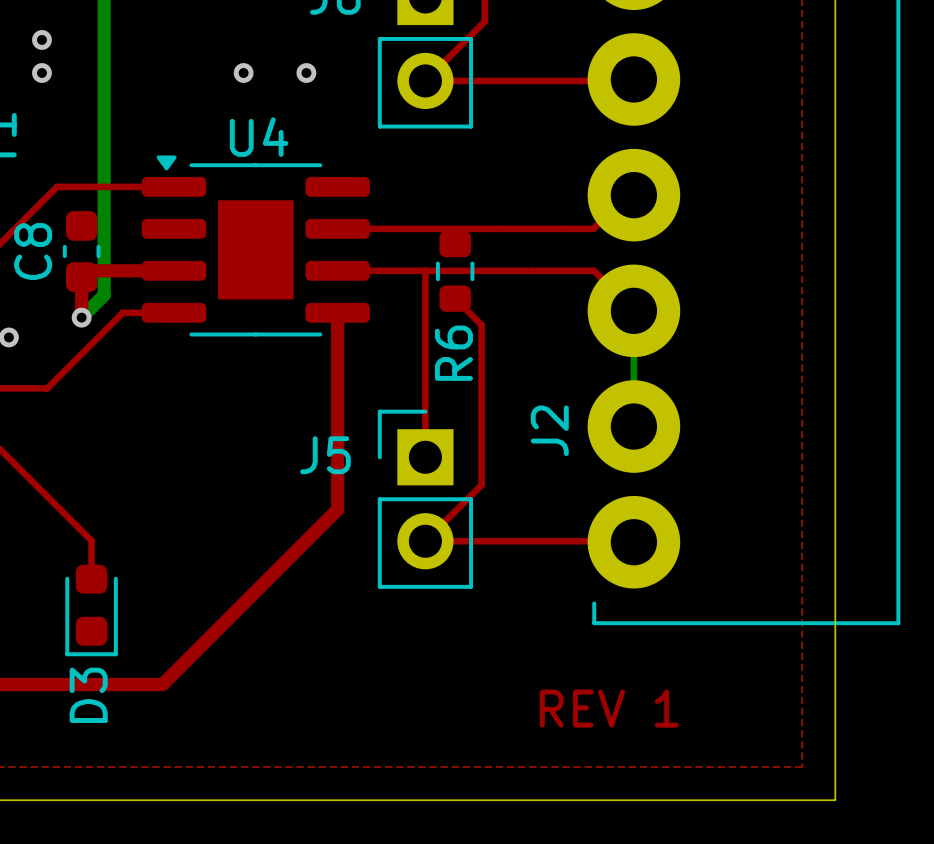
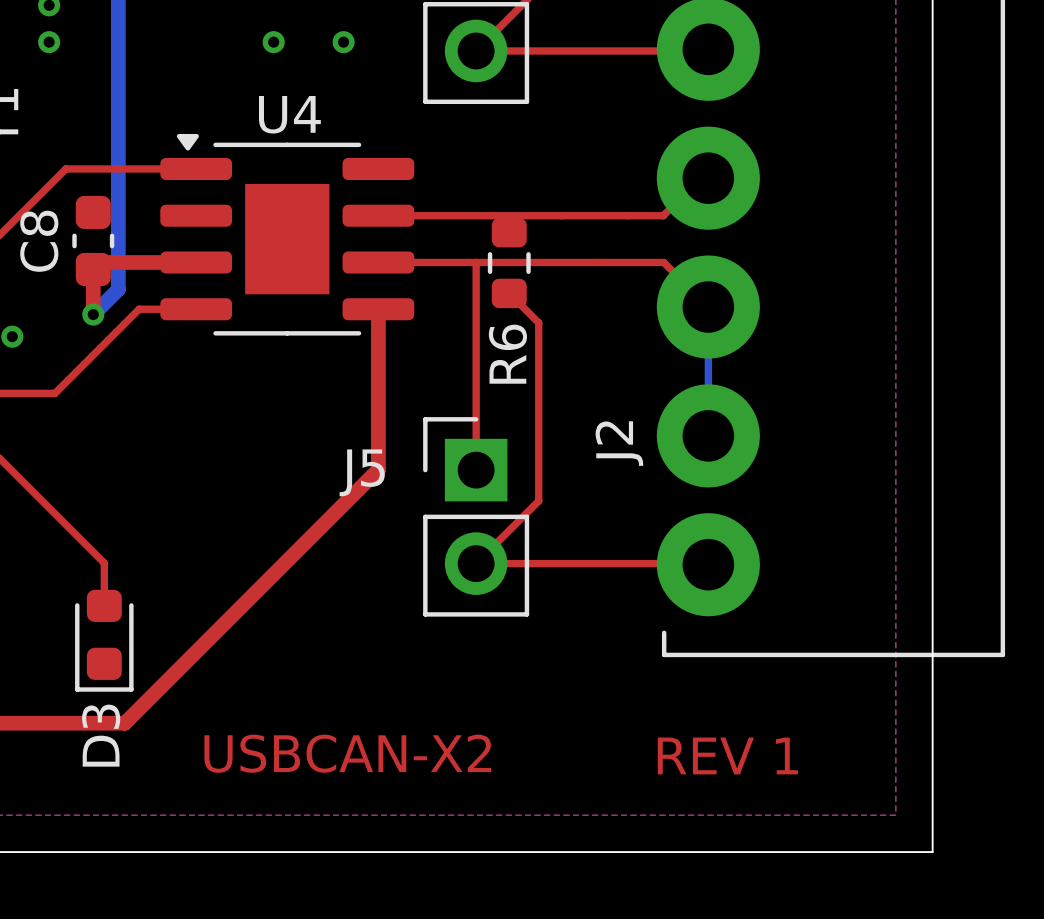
top track: (337, 456) (337, 509) (162, 684) (110, 684) -> (378, 469) (124, 723)
text position: REV 1 (609, 708) -> REV 1 (727, 755)
text: none -> USBCAN-X2 (347, 753)

